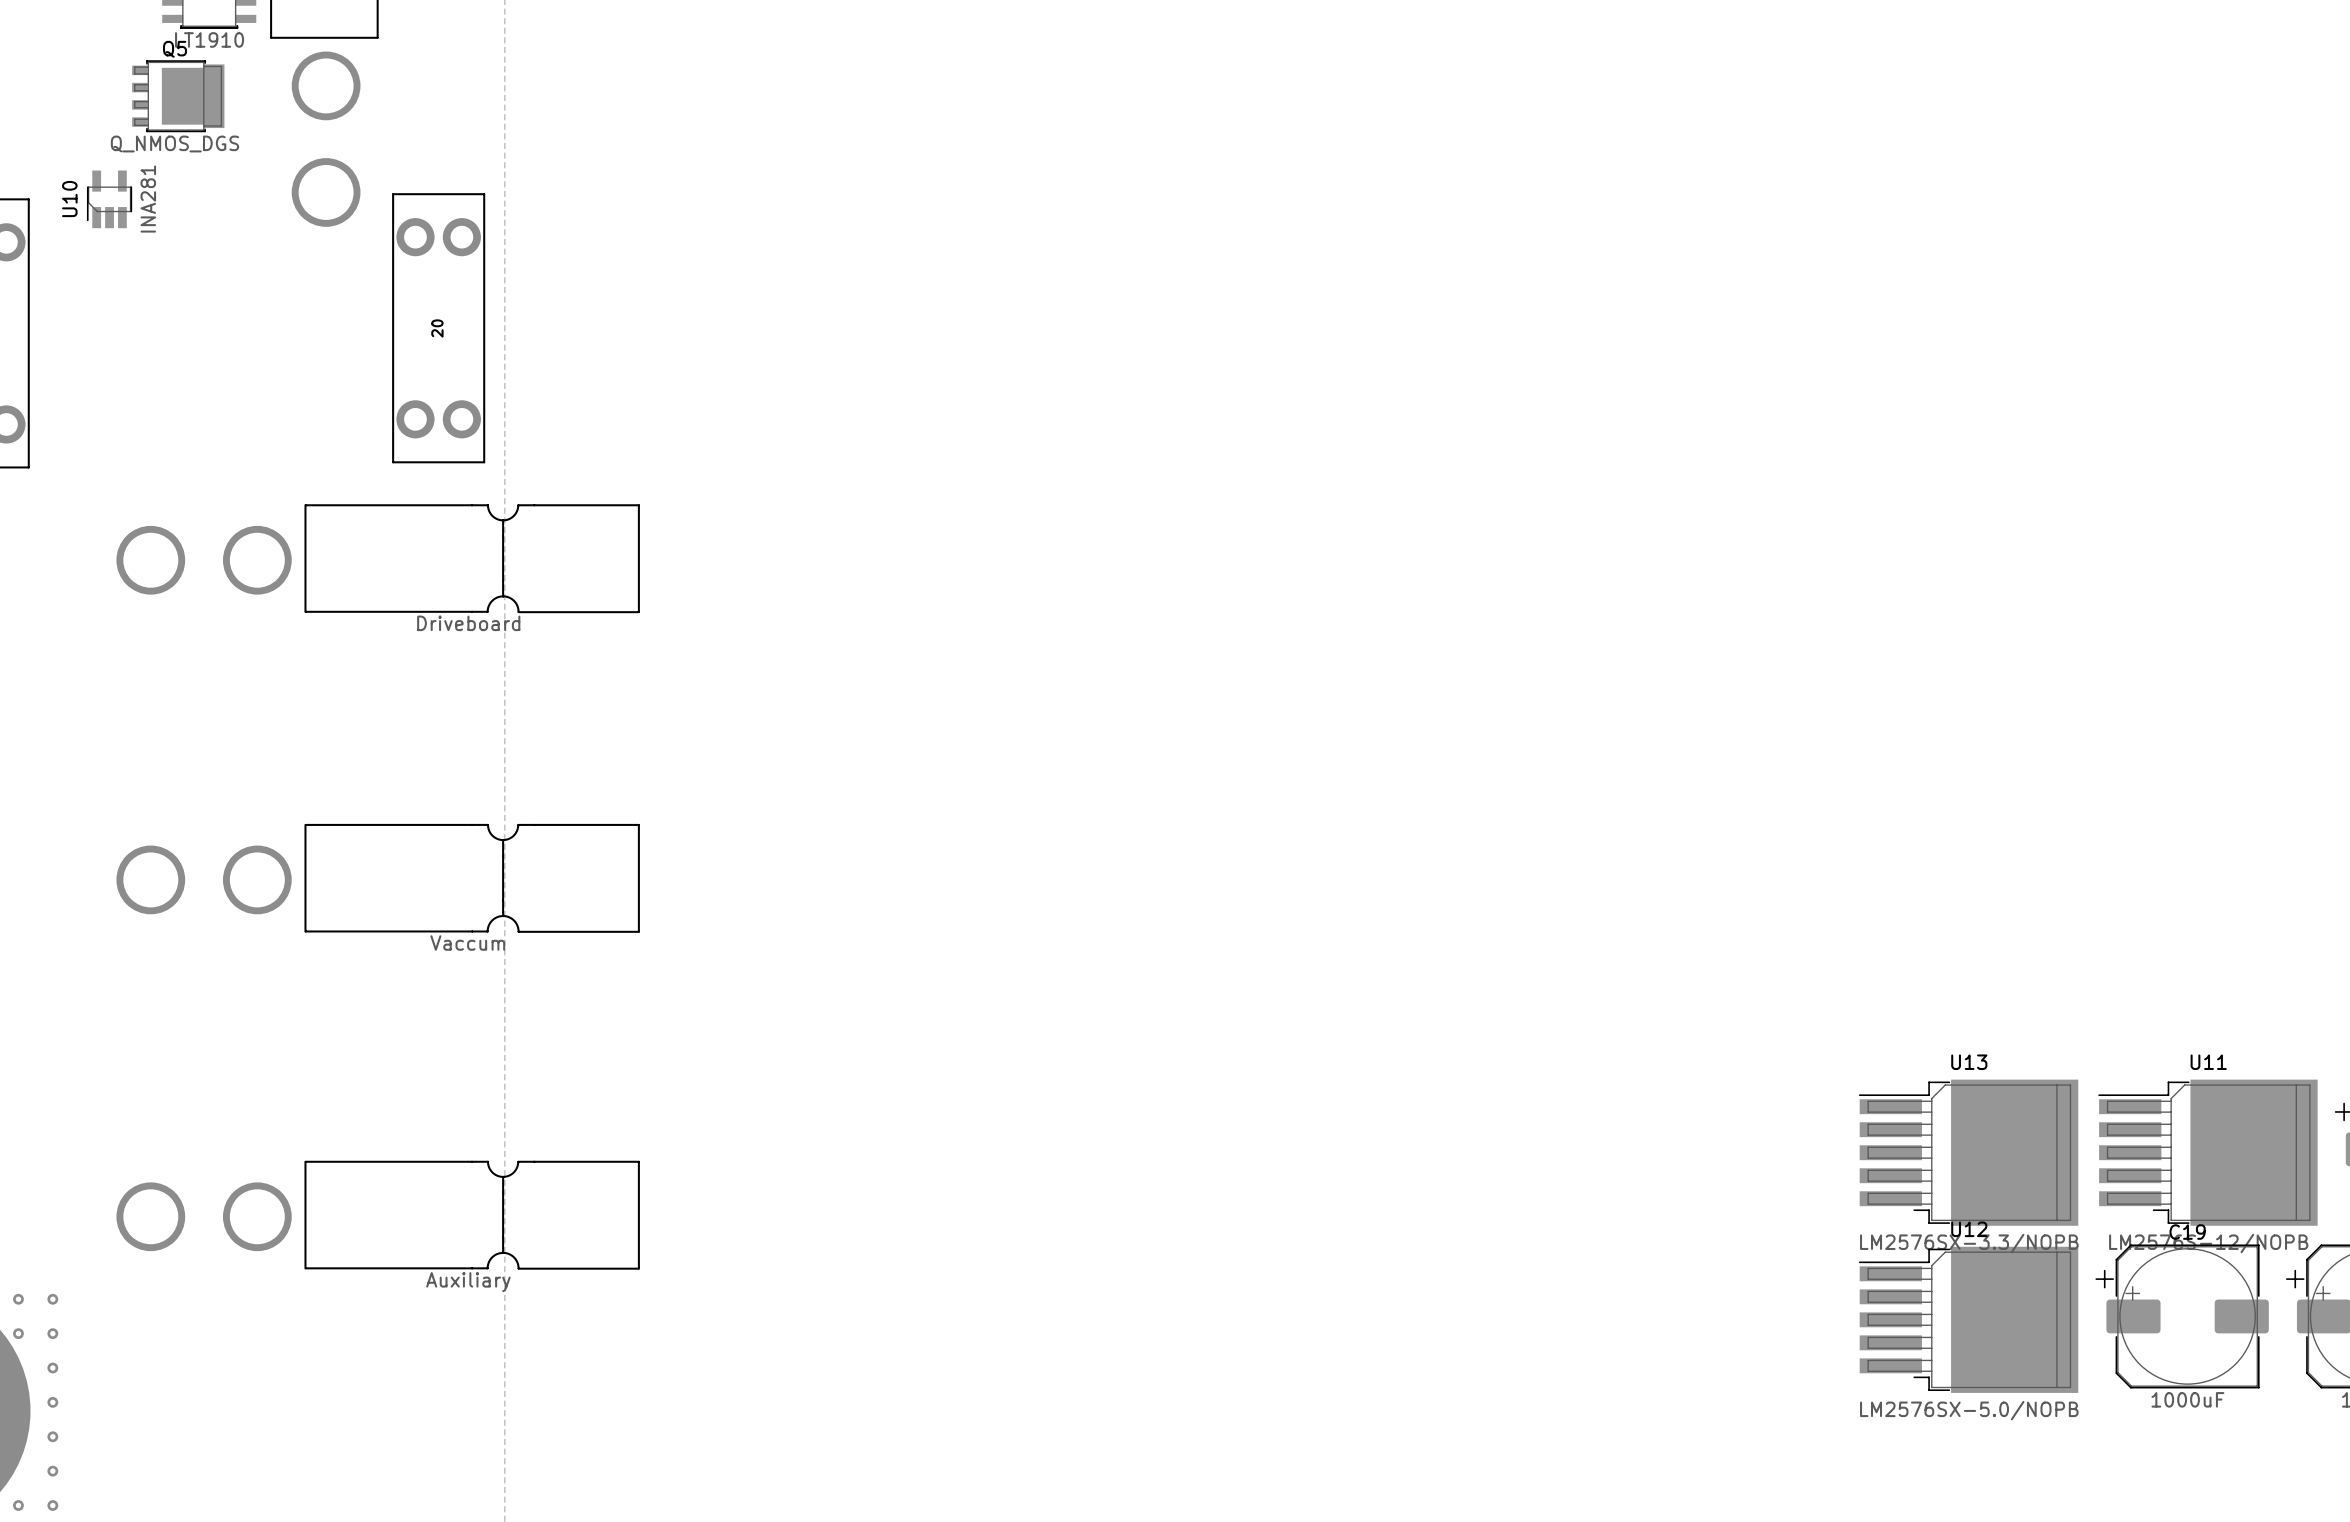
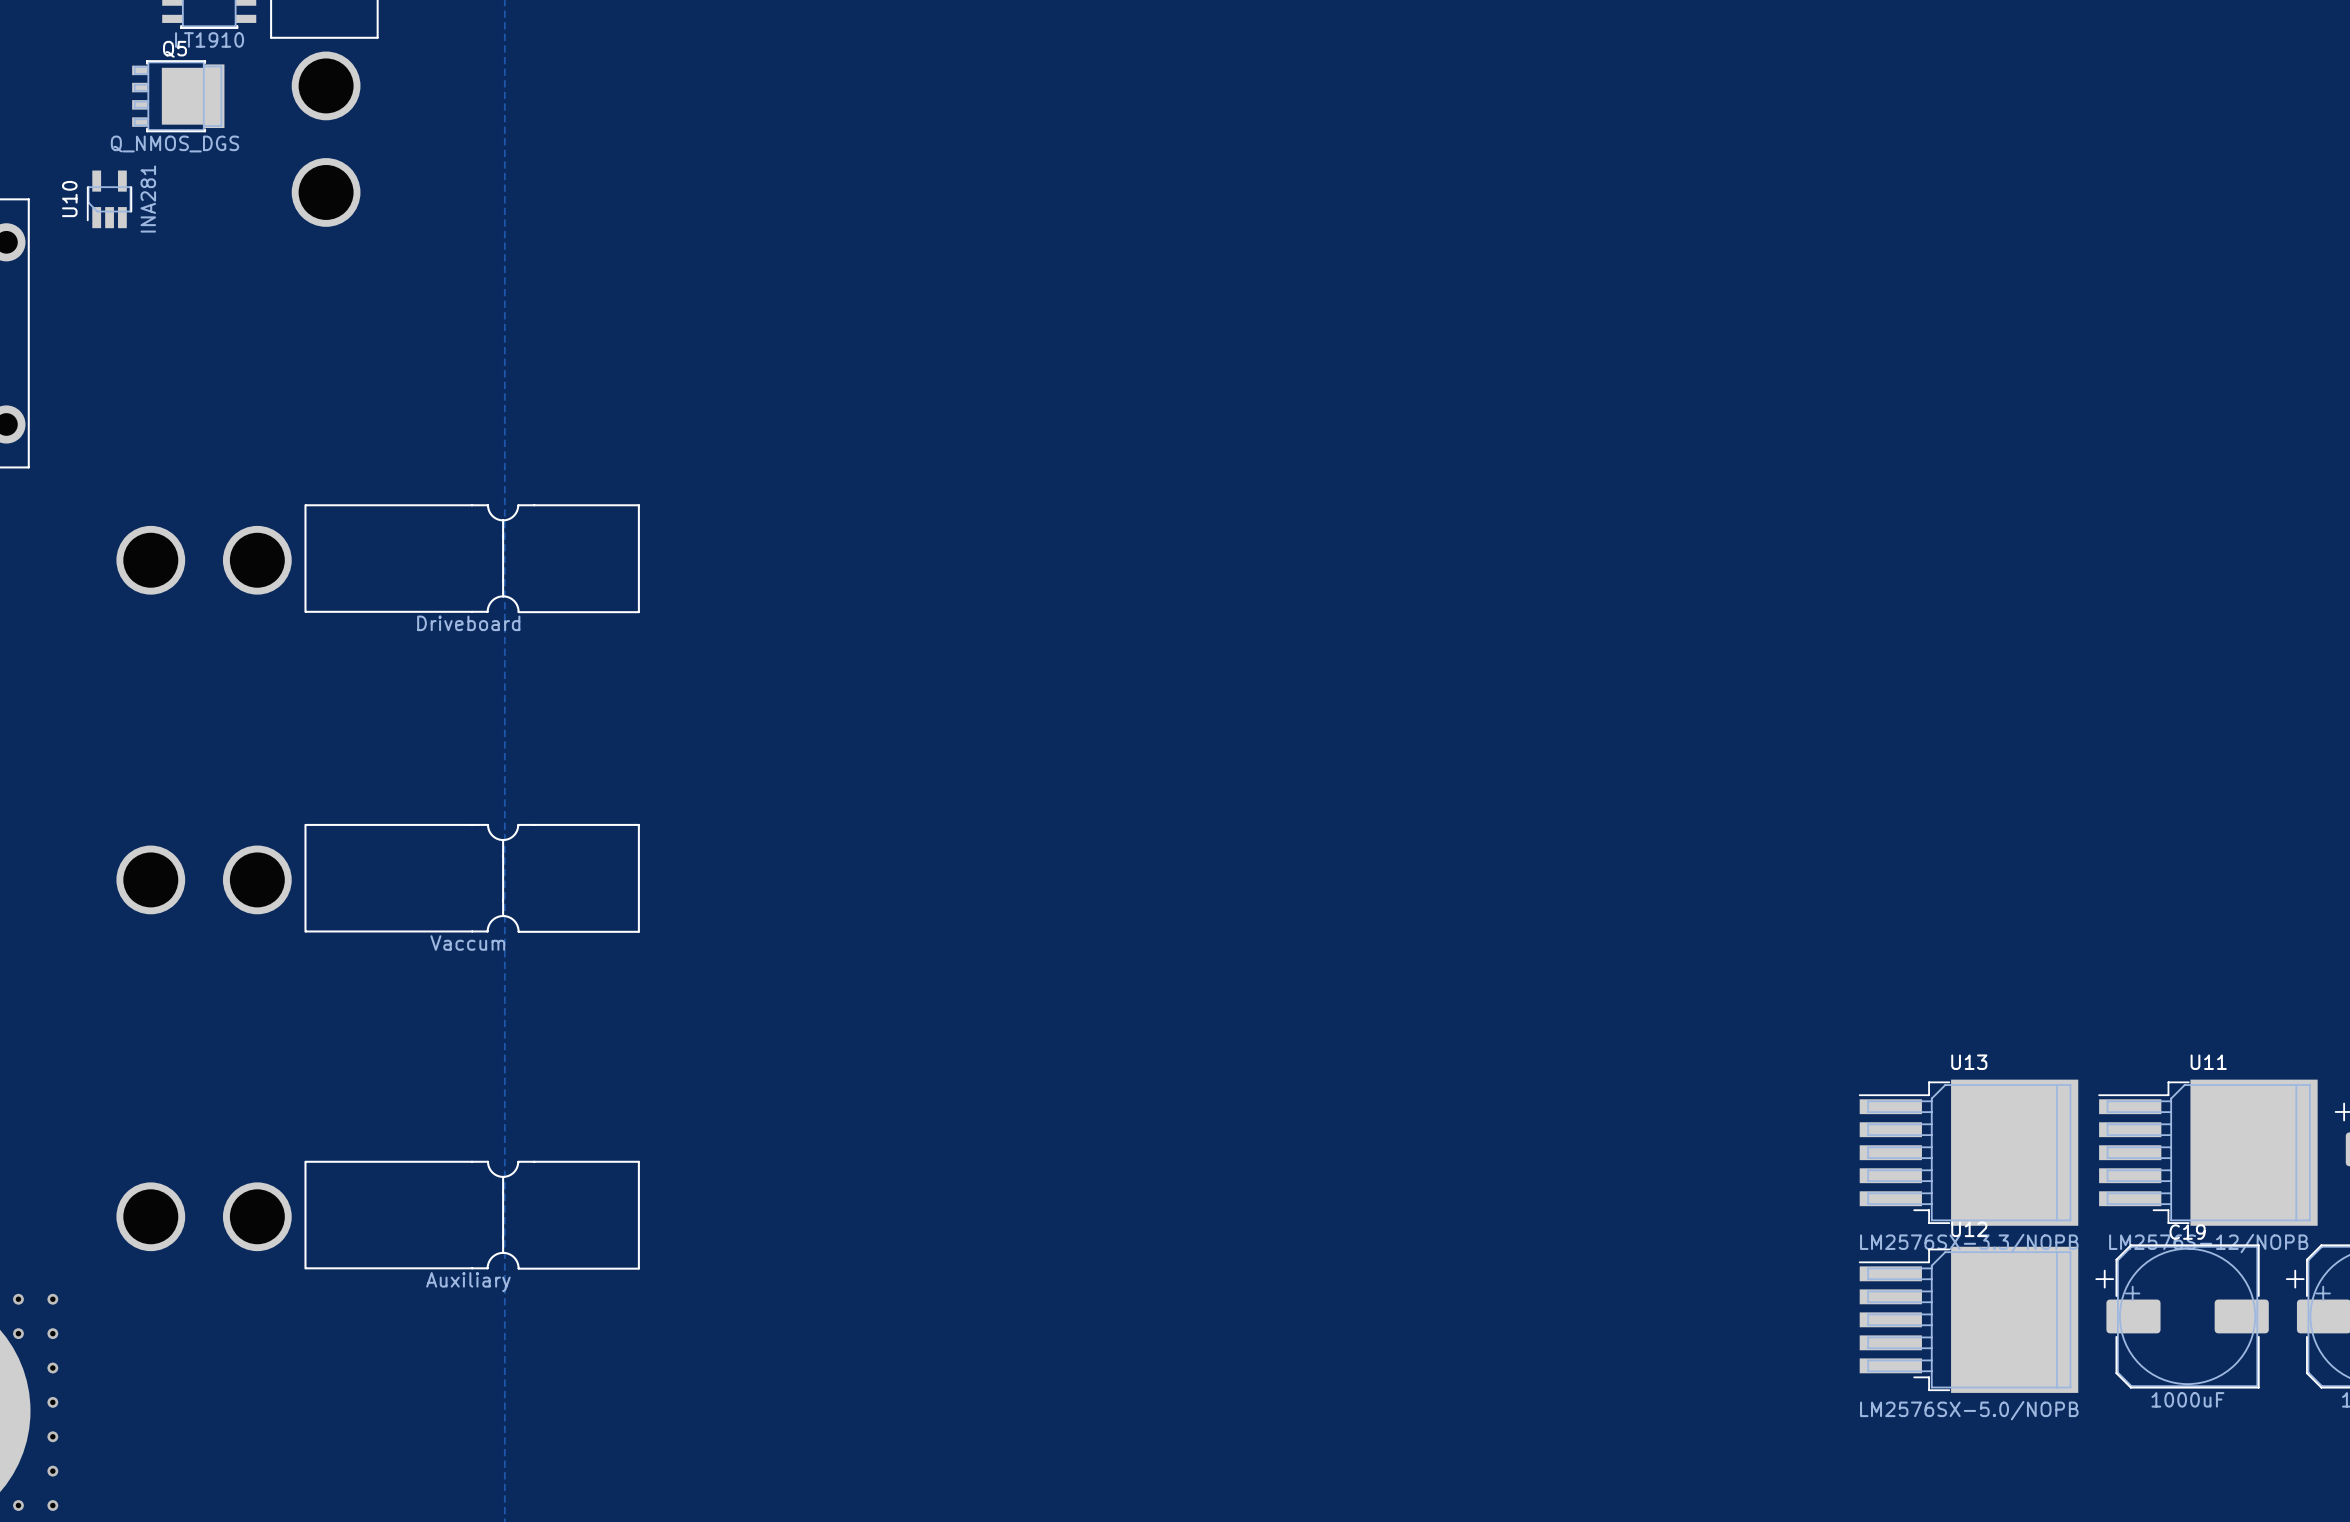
part: 20 (438, 328) -> none

